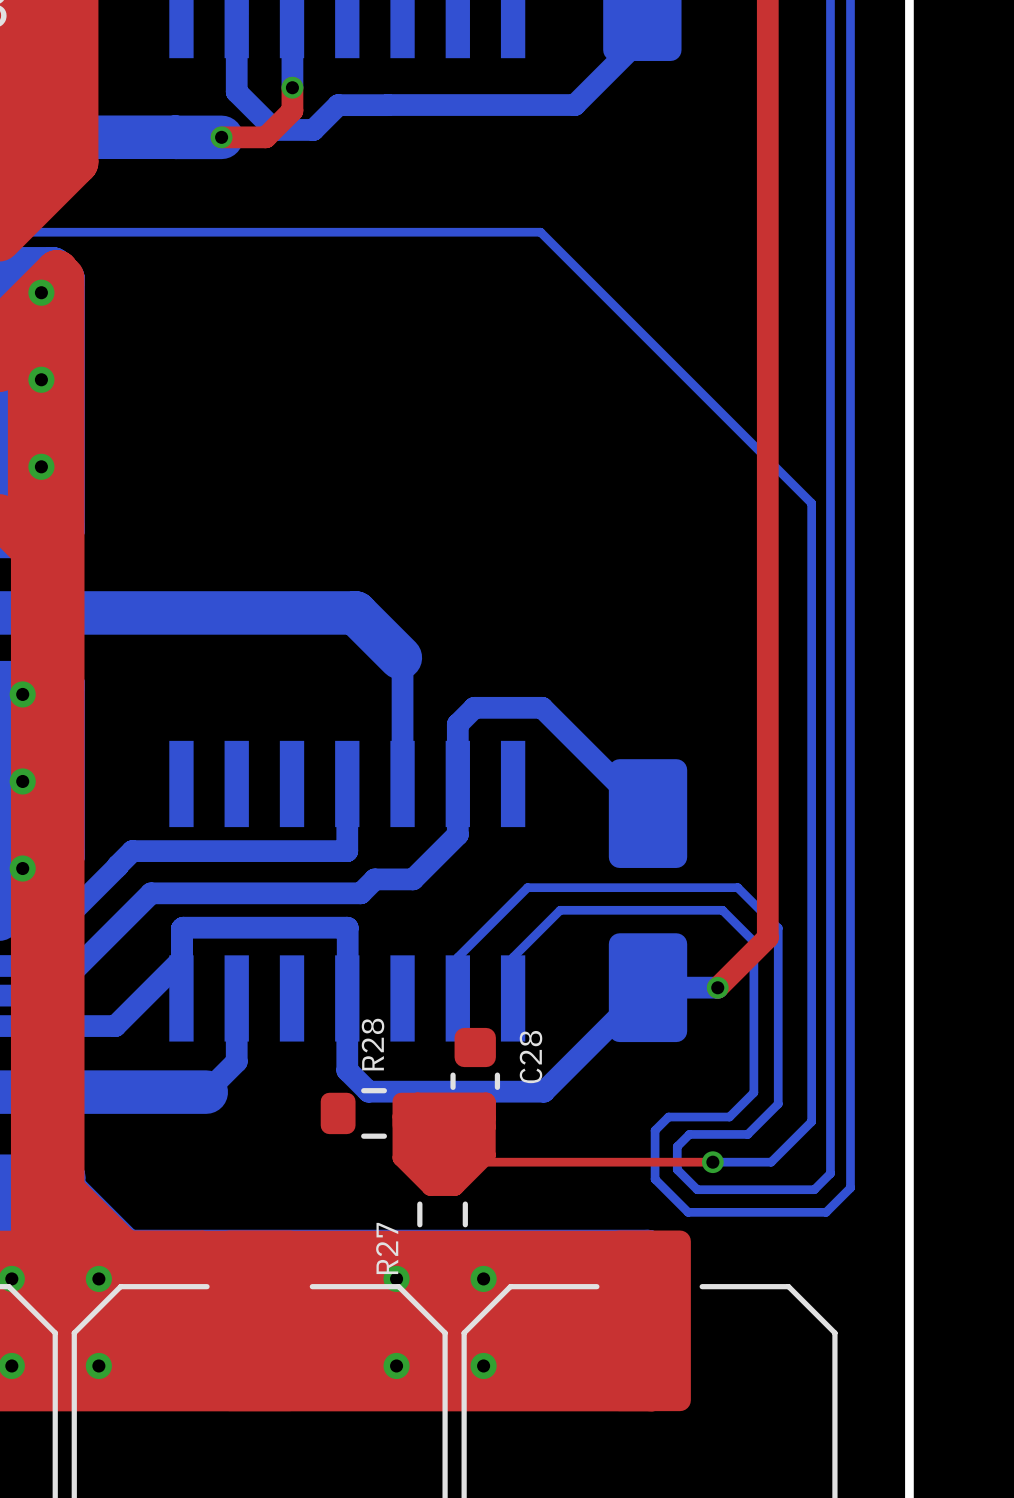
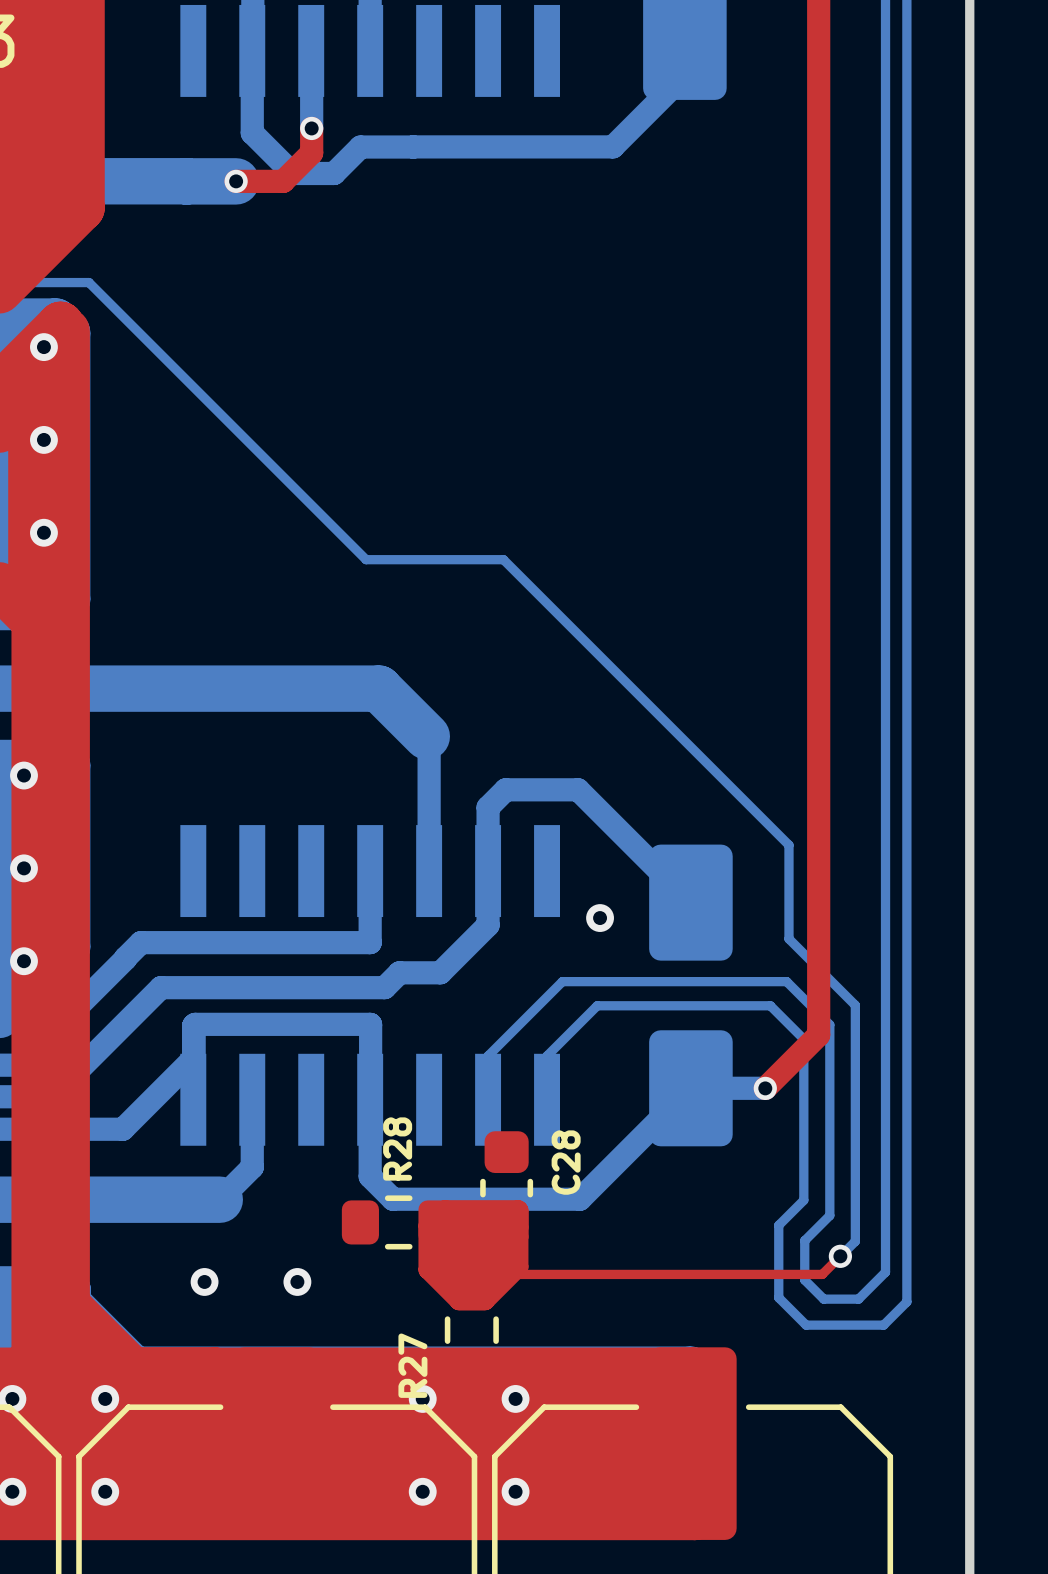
bottom track: (83, 232) (540, 232) (811, 503) (811, 1121) (802, 1131) -> (88, 282) (366, 559) (503, 559) (788, 845) (788, 938) (855, 1005) (855, 1241)
via: none -> (600, 918)
bottom track: (778, 1103) (747, 1134) (689, 1134) (677, 1146) (677, 1169) (697, 1189) (814, 1189) (830, 1173) (830, 1160) -> (829, 1212) (829, 1215) (804, 1240) (804, 1280) (823, 1299) (858, 1299) (885, 1272)
bottom track: (730, 1116) (668, 1117) (655, 1130) (655, 1179) (688, 1212) (826, 1212) (828, 1209) -> (778, 1225) (778, 1297) (806, 1325) (883, 1325)
top track: none -> (840, 1256) (822, 1274) (760, 1274)
bottom track: (788, 1145) (771, 1162) (712, 1162) -> none
via position: (712, 1162) -> (840, 1256)
via: none -> (204, 1281)
via: none -> (297, 1281)

